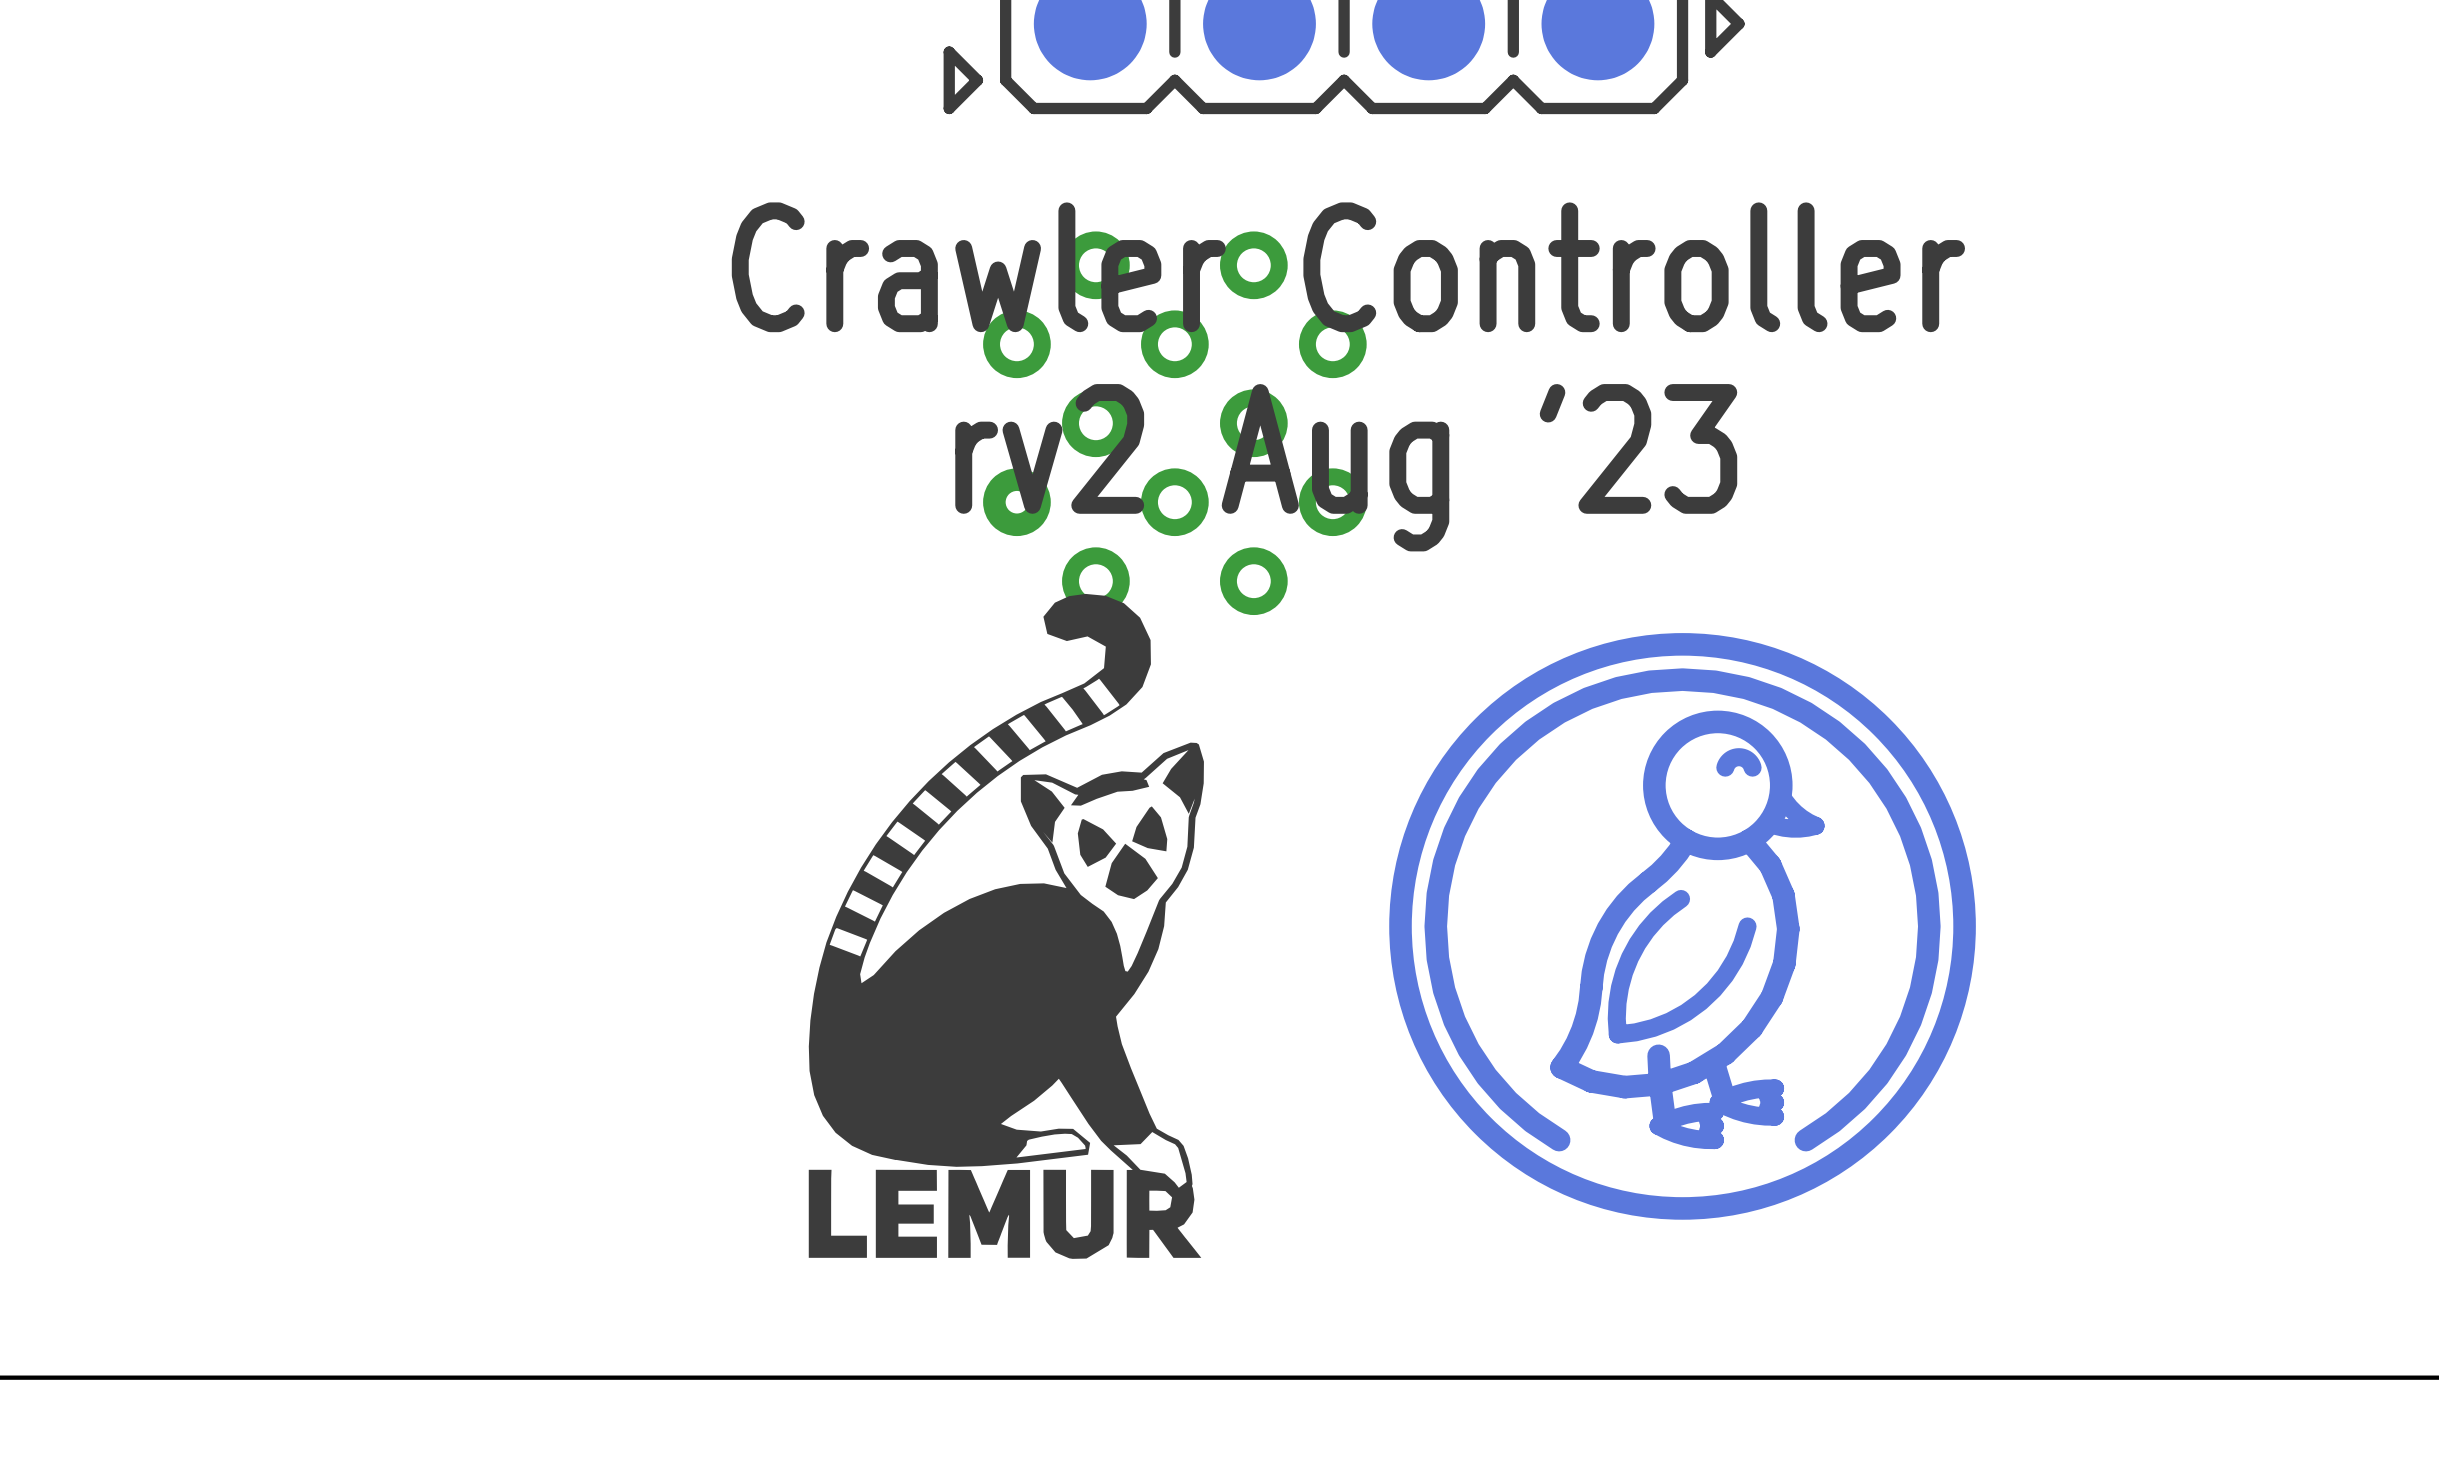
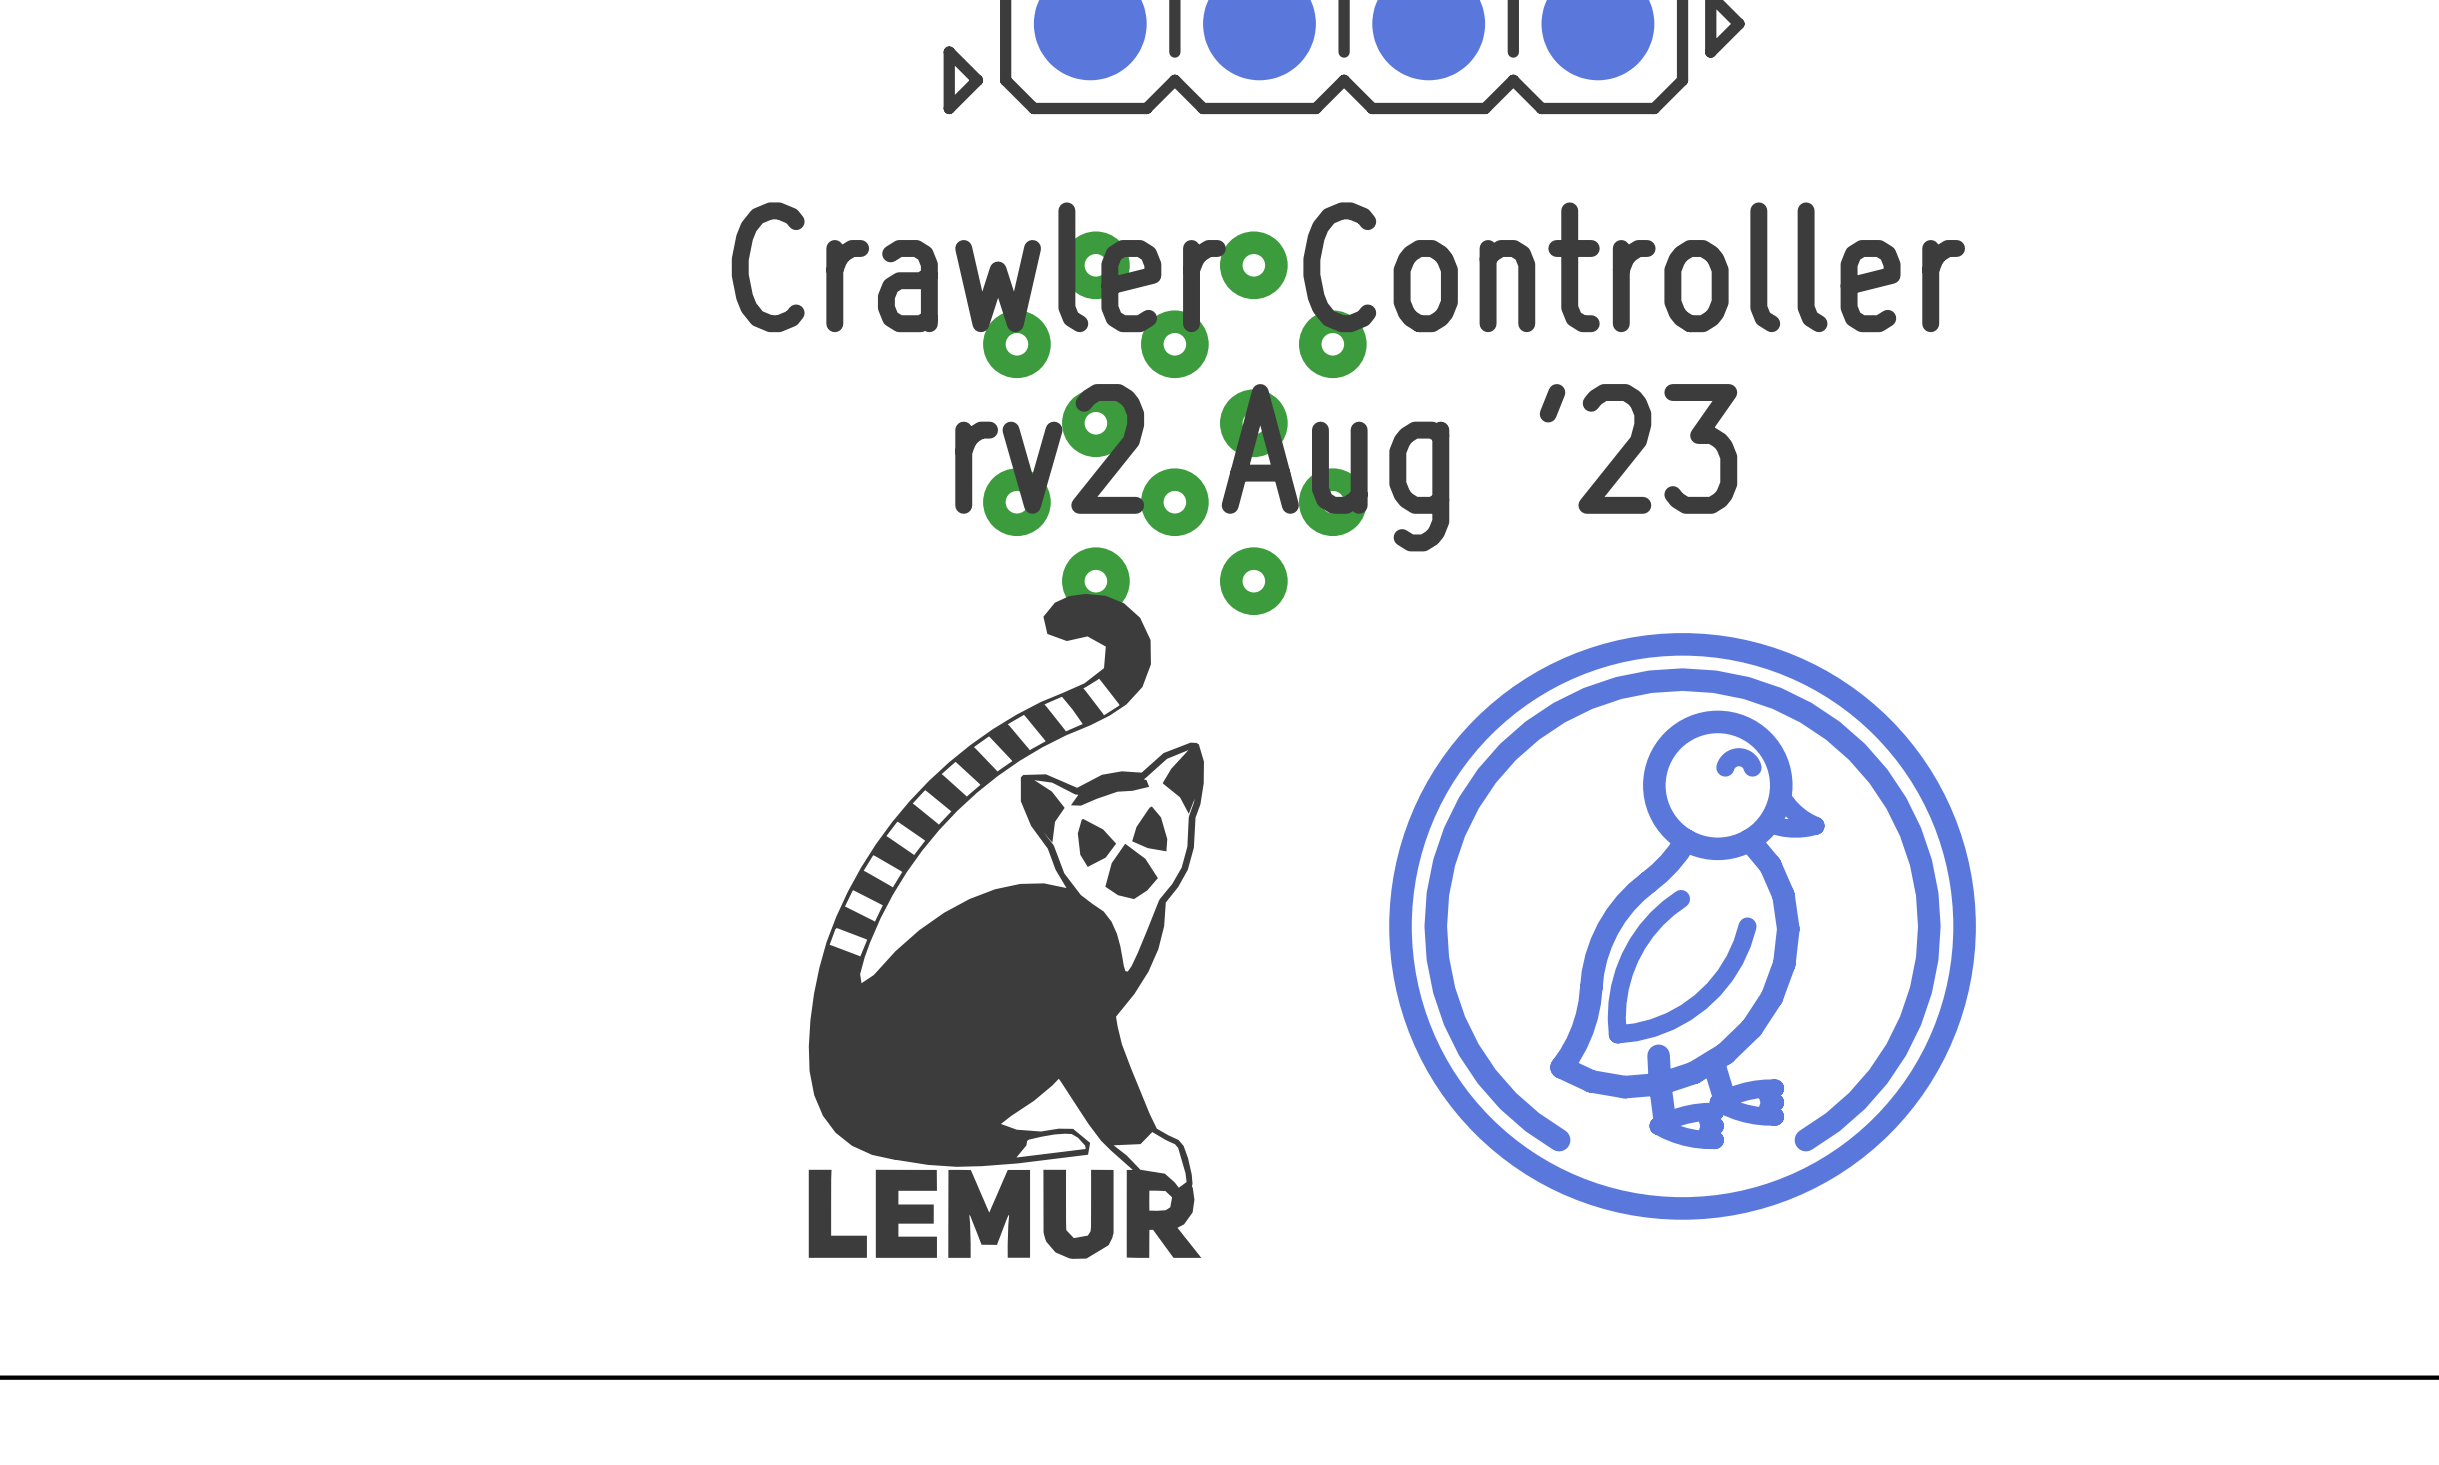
part footprint: [983, 231, 1367, 616] -> [983, 231, 1367, 616]

